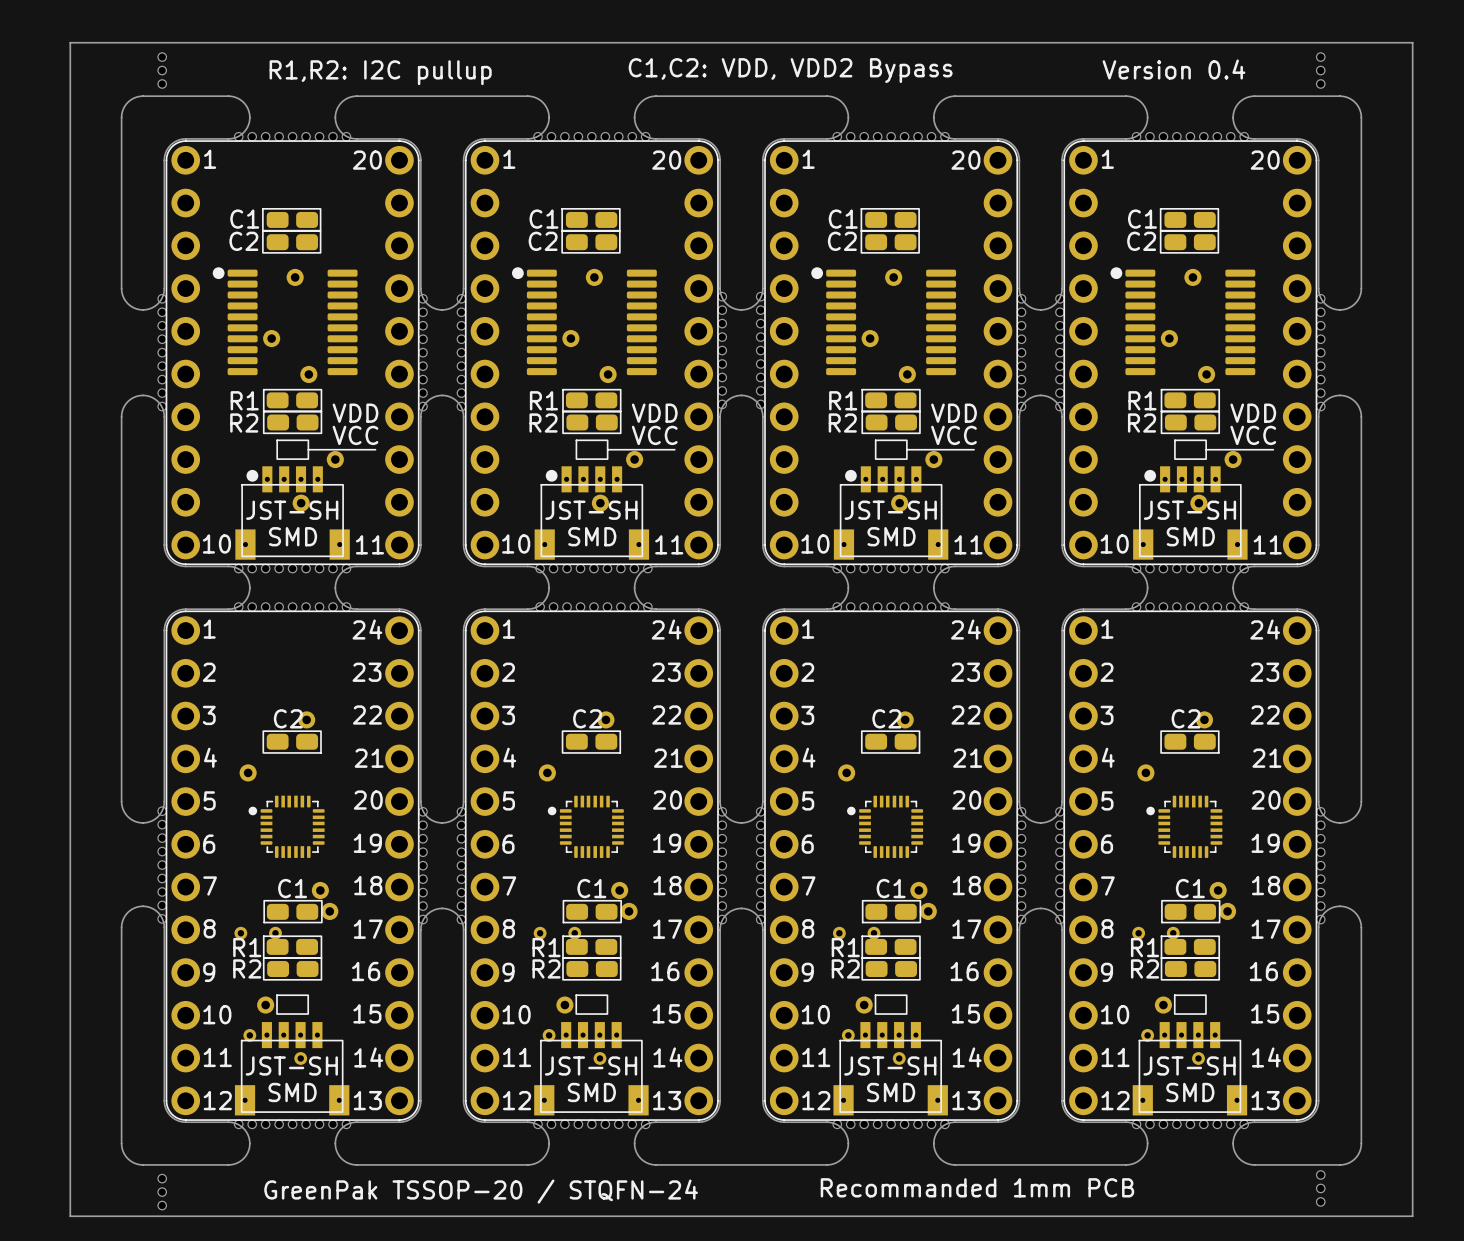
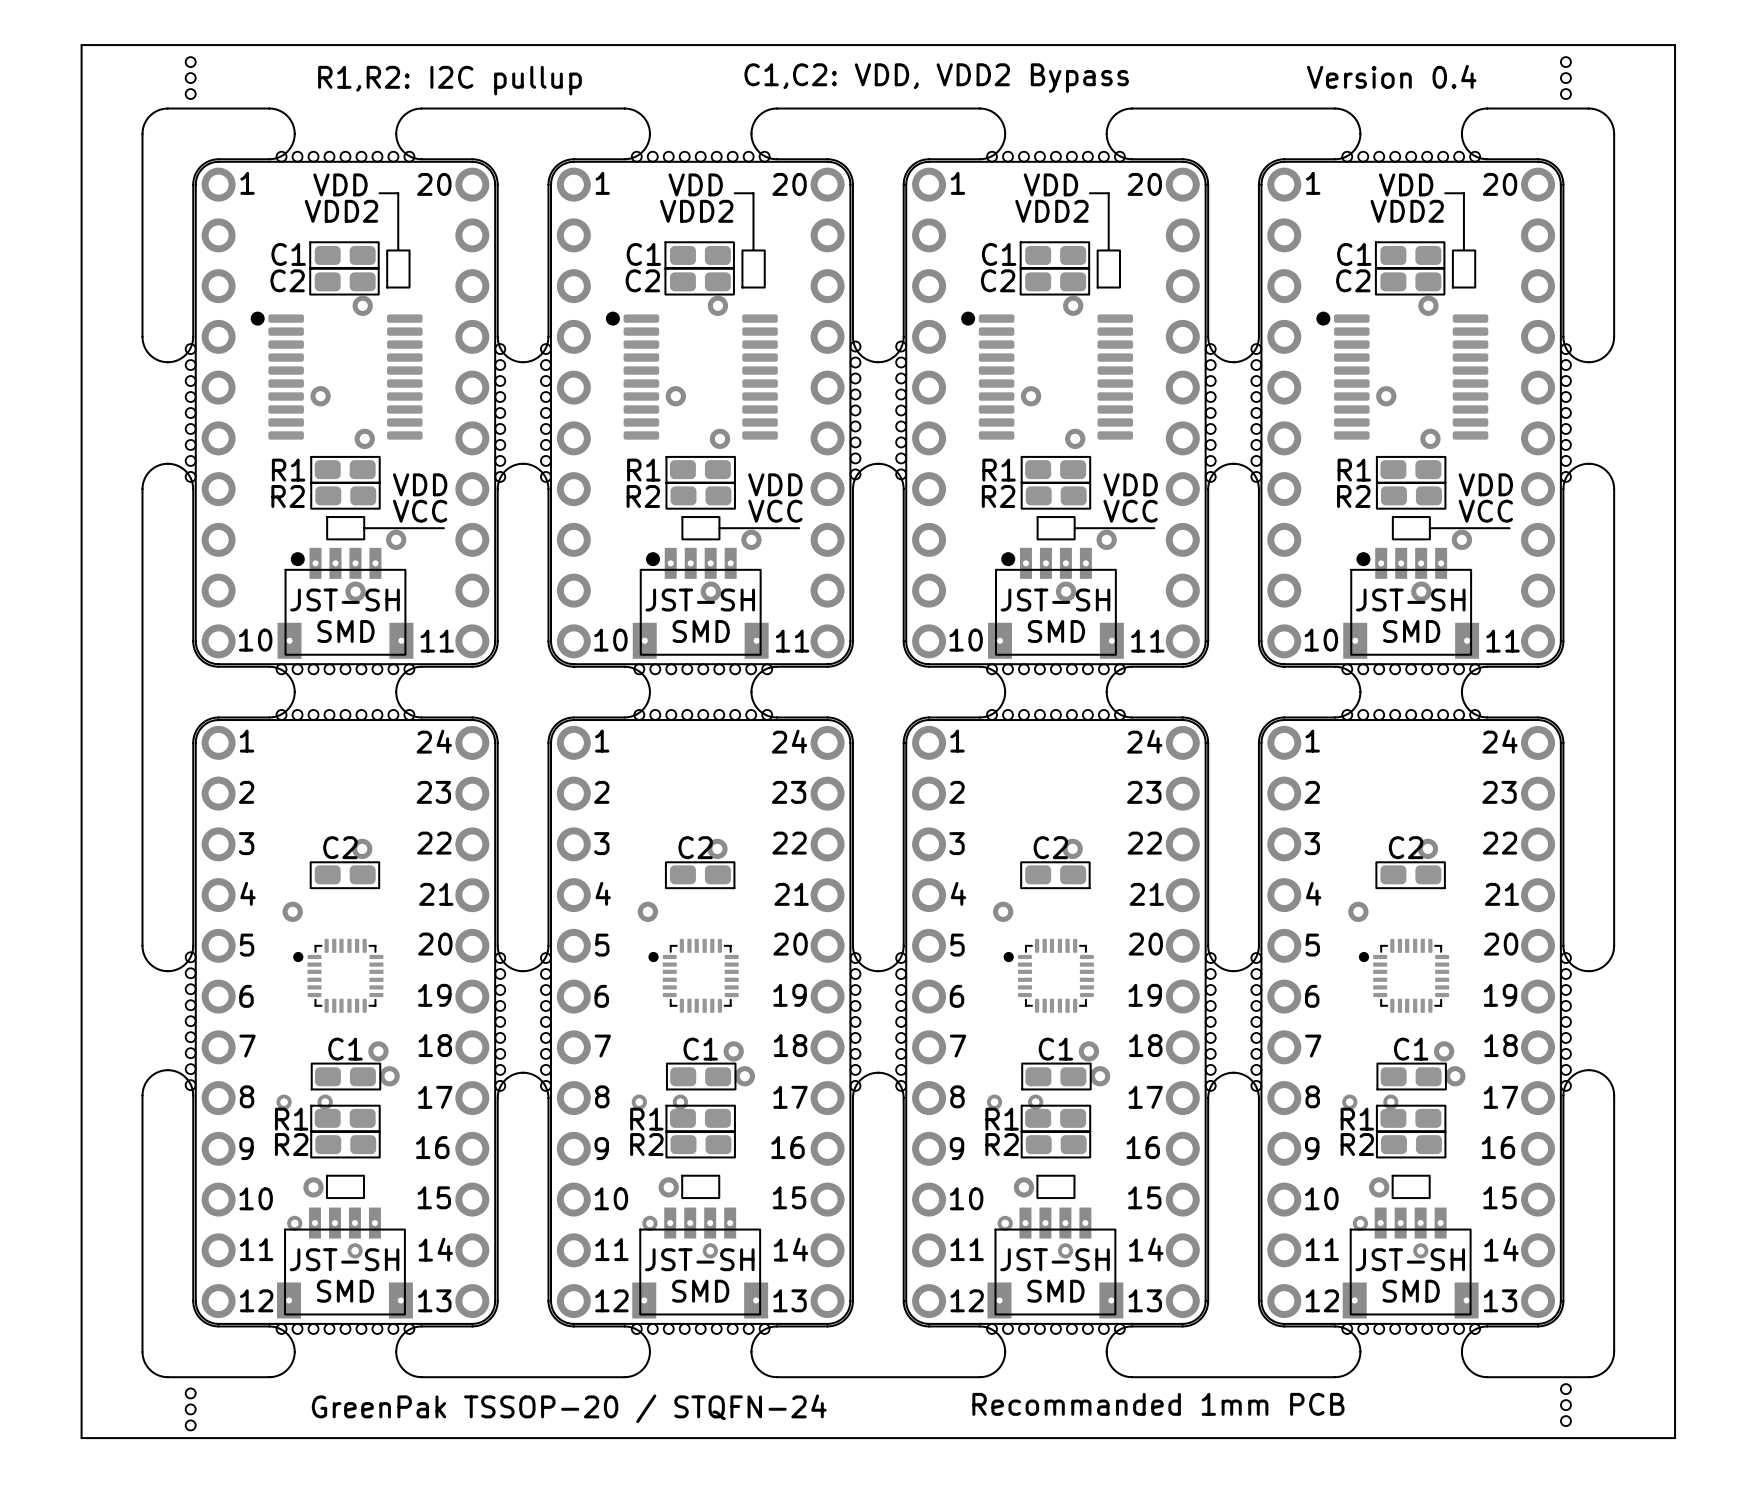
part footprint: [165, 140, 420, 566] -> [194, 160, 497, 666]
part footprint: [464, 140, 719, 566] -> [550, 160, 852, 666]
part footprint: [764, 140, 1019, 566] -> [905, 160, 1207, 666]
part footprint: [1063, 140, 1318, 566] -> [1260, 160, 1562, 666]

